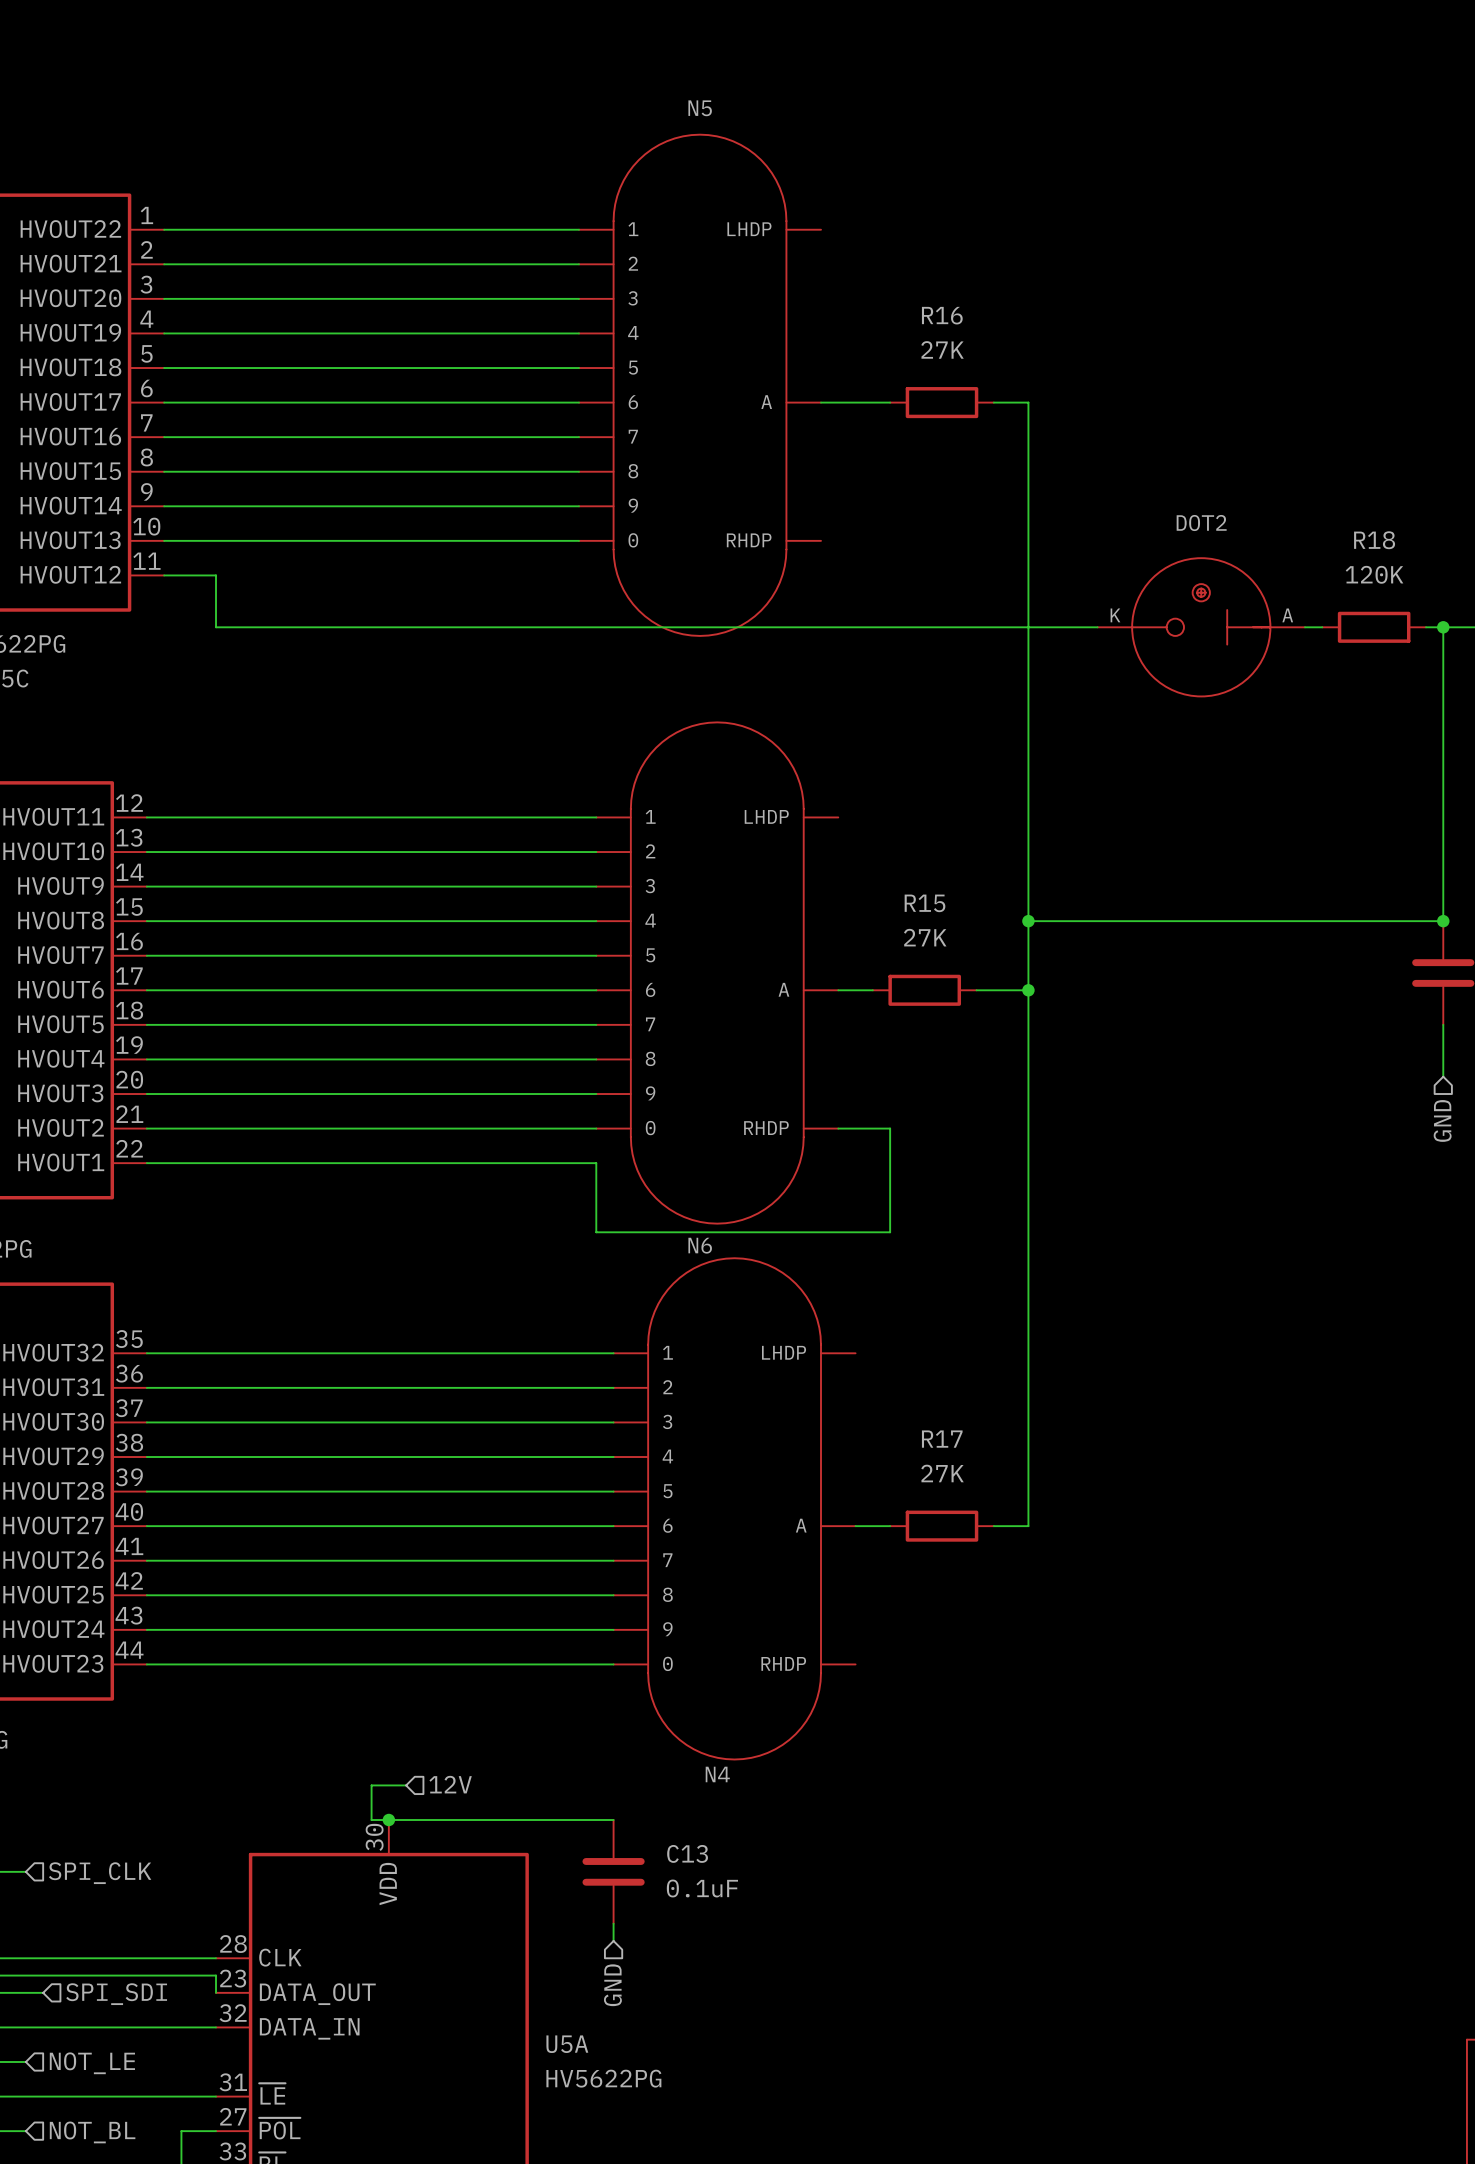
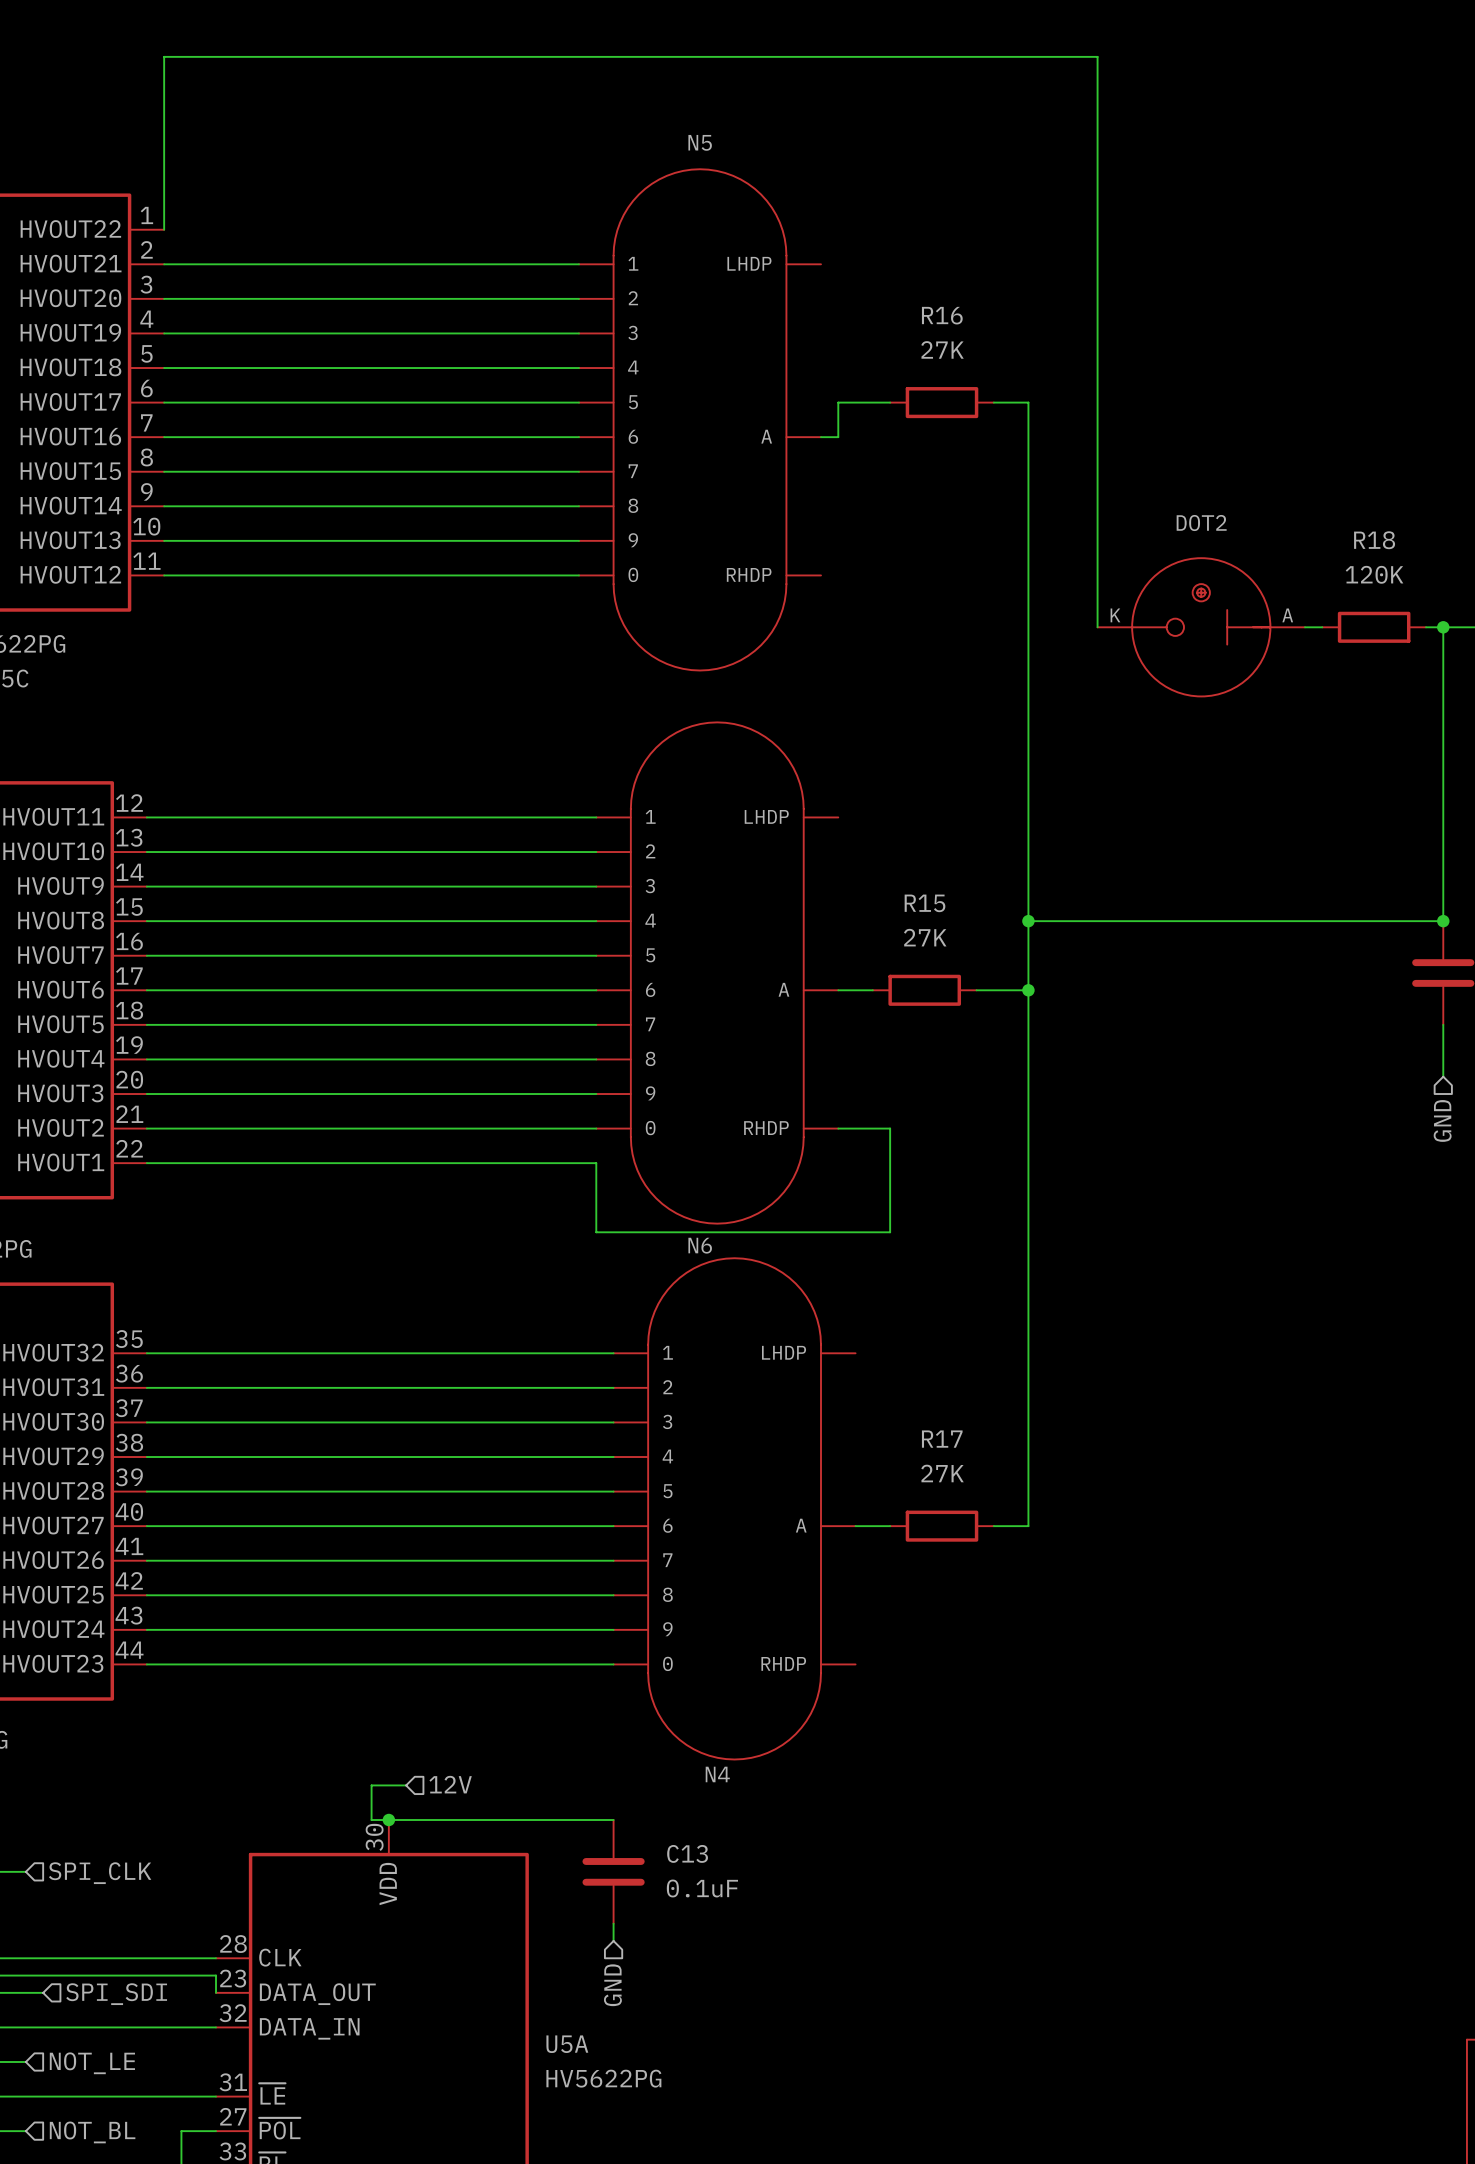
wire: (164, 229) (579, 229) -> none
N5 position: (700, 385) -> (700, 419)
wire: (821, 402) (838, 402) -> (821, 437) (838, 437) (838, 402)
wire: (216, 575) (216, 627) (1097, 627) -> (164, 229) (164, 56) (1097, 56) (1097, 627)
wire: none -> (216, 575) (579, 575)

